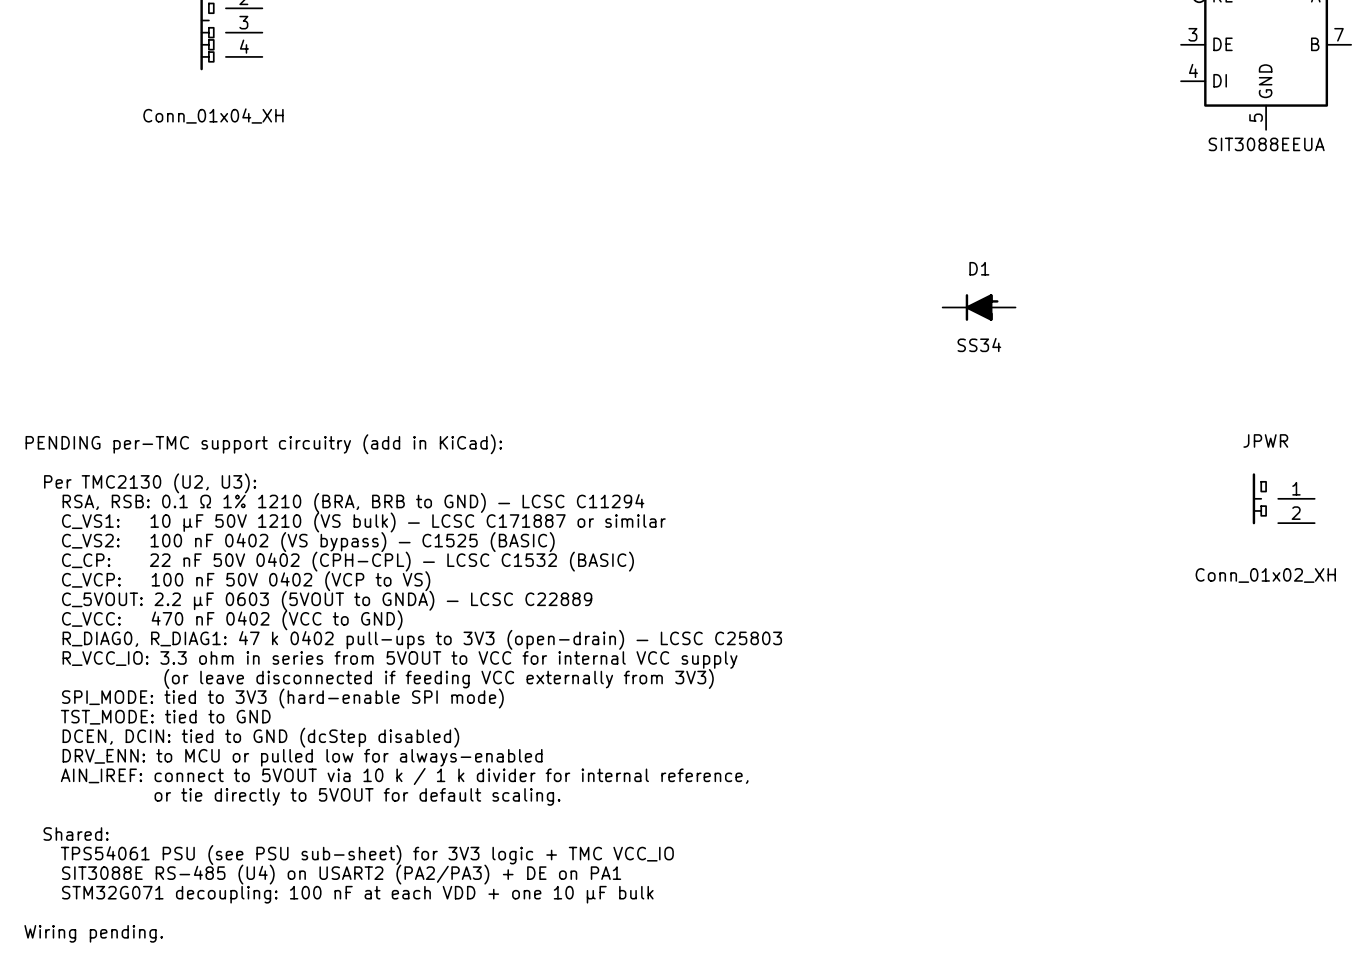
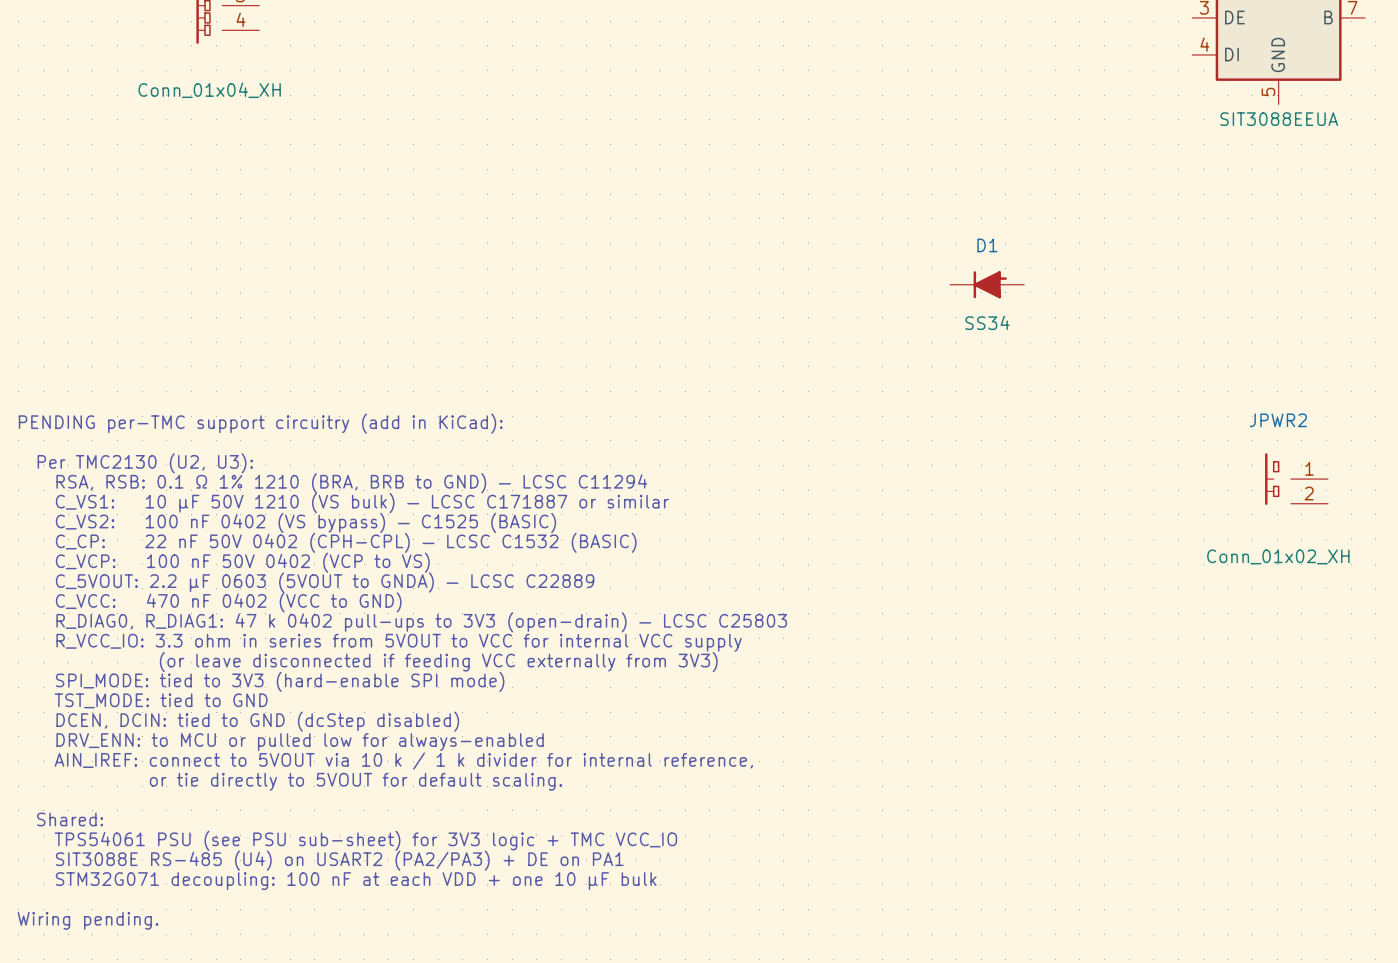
JPWR name: JPWR (1265, 440) -> JPWR2 (1278, 420)

